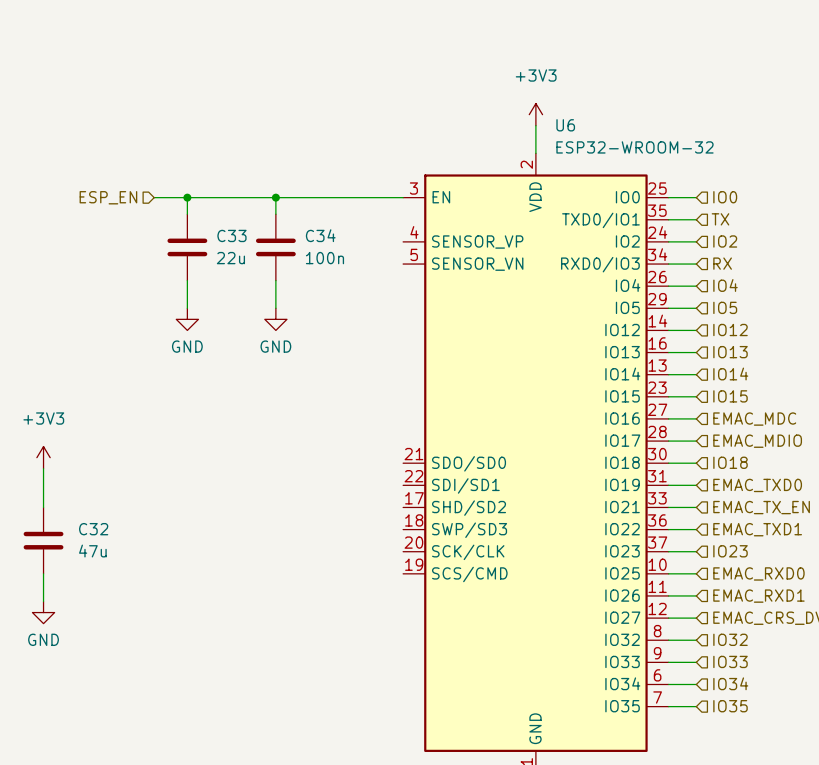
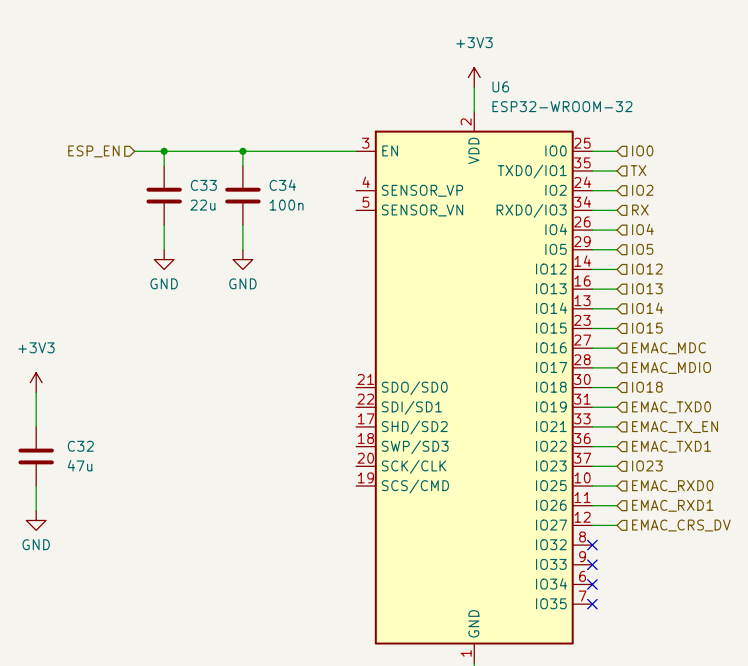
hierarchical label: IO32 (730, 639) -> none
wire: (668, 640) (696, 640) -> none
no-connect mark: none -> (592, 545)
hierarchical label: IO33 (730, 661) -> none
wire: (668, 662) (696, 662) -> none
no-connect mark: none -> (592, 564)
hierarchical label: IO34 (730, 683) -> none
wire: (668, 684) (696, 684) -> none
no-connect mark: none -> (592, 584)
wire: (668, 706) (696, 706) -> none
no-connect mark: none -> (592, 604)
hierarchical label: IO35 (730, 706) -> none

